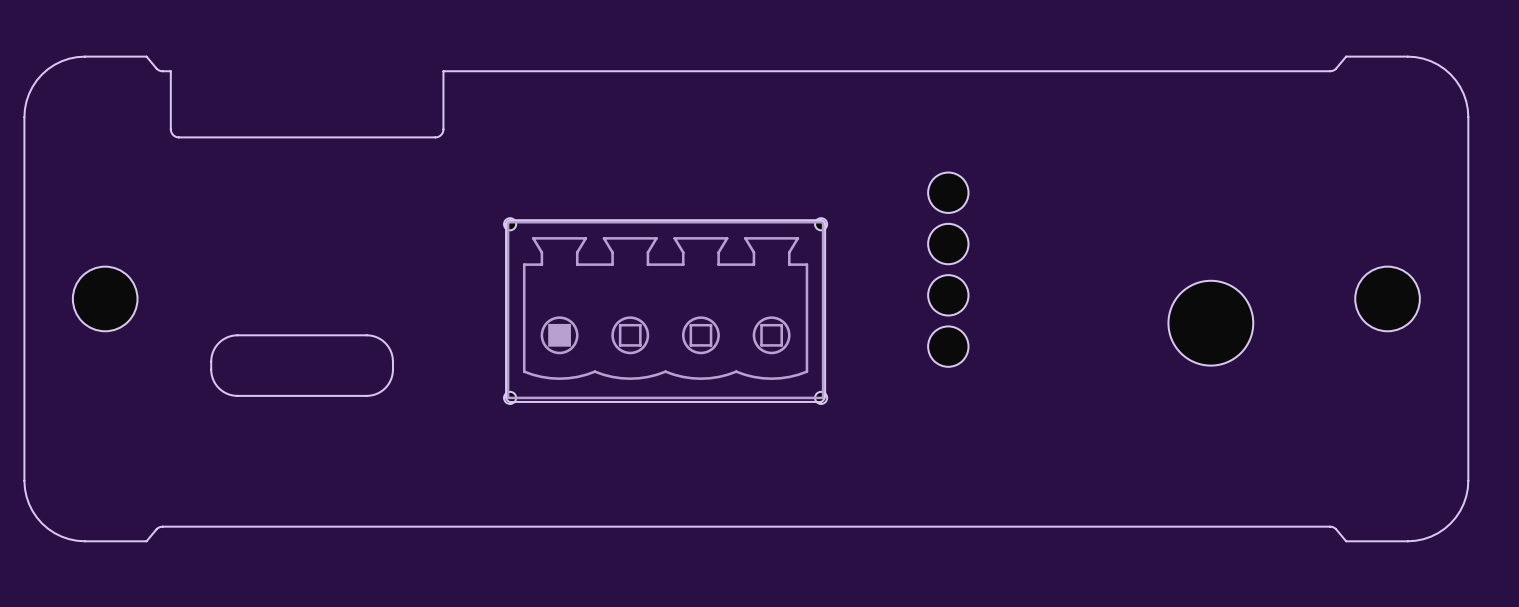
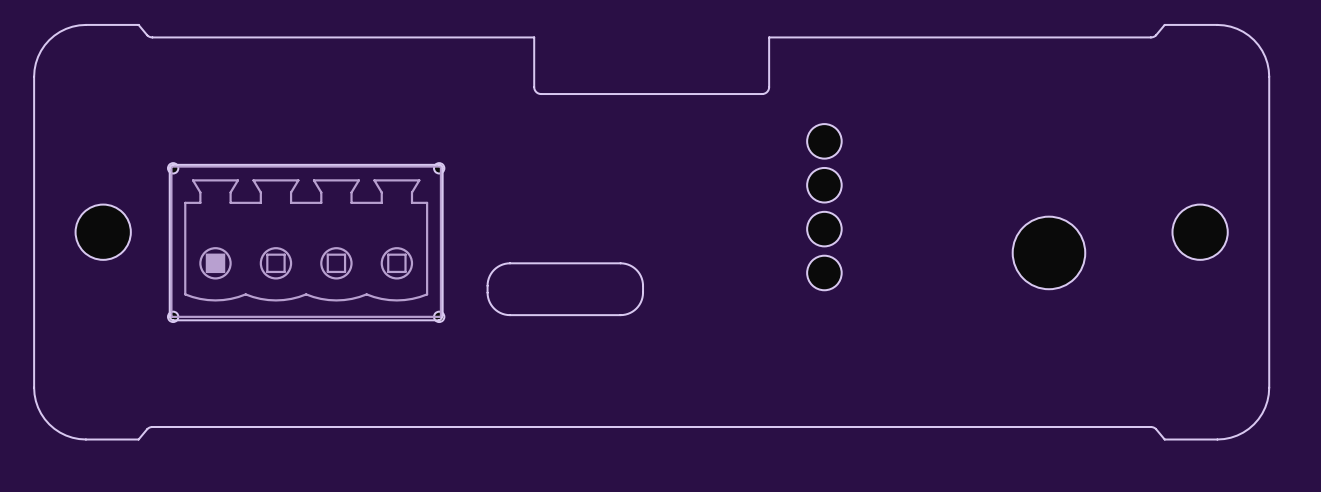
part footprint: [23, 56, 1469, 542] -> [33, 24, 1270, 440]
part position: (665, 311) -> (306, 242)
board edge: (237, 335) (372, 335) (383, 341) (390, 350) (392, 358) (392, 375) (383, 390) (369, 395) (231, 395) (223, 391) (215, 383) (211, 372) (211, 358) (215, 347) (221, 341) (237, 335) -> (510, 263) (625, 263) (634, 268) (640, 276) (642, 283) (642, 297) (636, 308) (623, 314) (505, 314) (498, 311) (491, 304) (487, 295) (487, 283) (494, 269) (500, 265) (510, 263)

